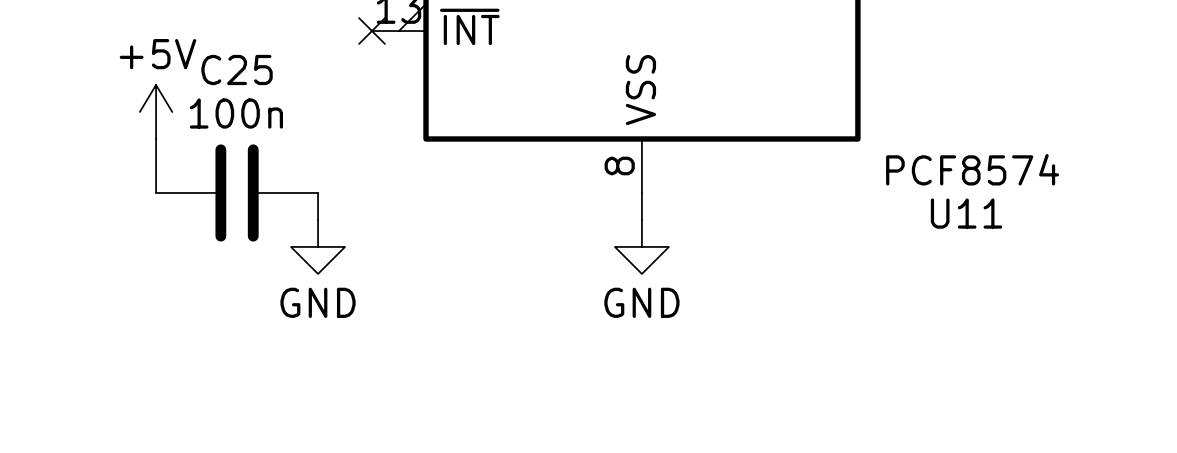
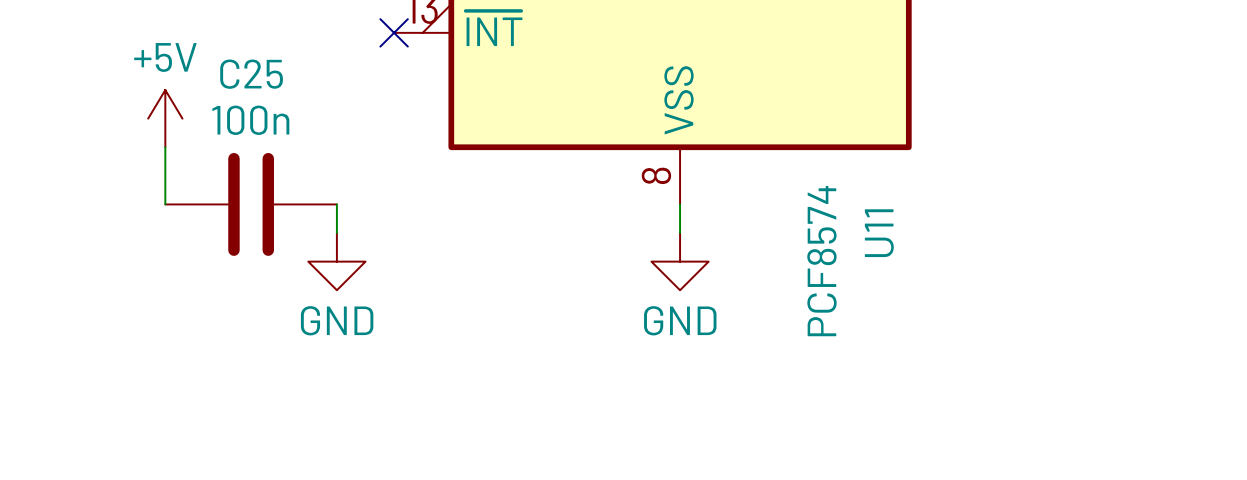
U11 value rotation: 0° (972, 169) -> 90° counterclockwise (821, 261)
U11 value position: PCF8574 (972, 169) -> PCF8574 (821, 261)
U11 name rotation: 0° (966, 213) -> 90° counterclockwise (879, 233)
U11 name position: U11 (966, 213) -> U11 (879, 233)

